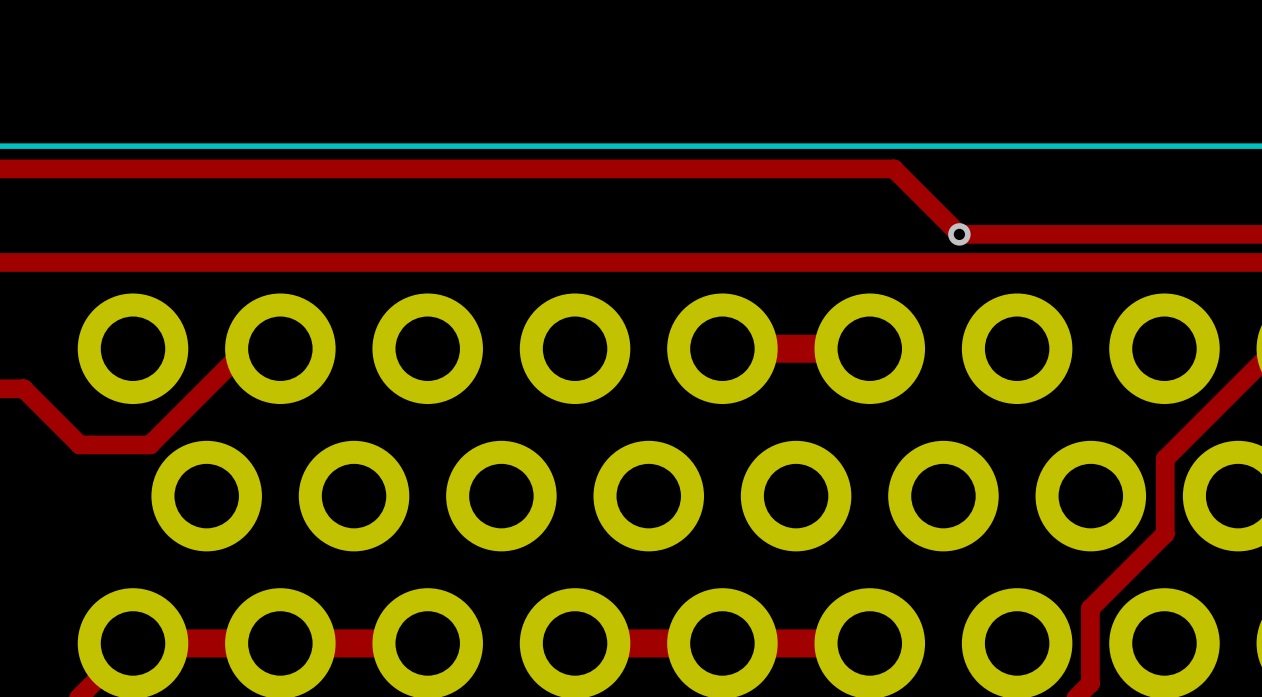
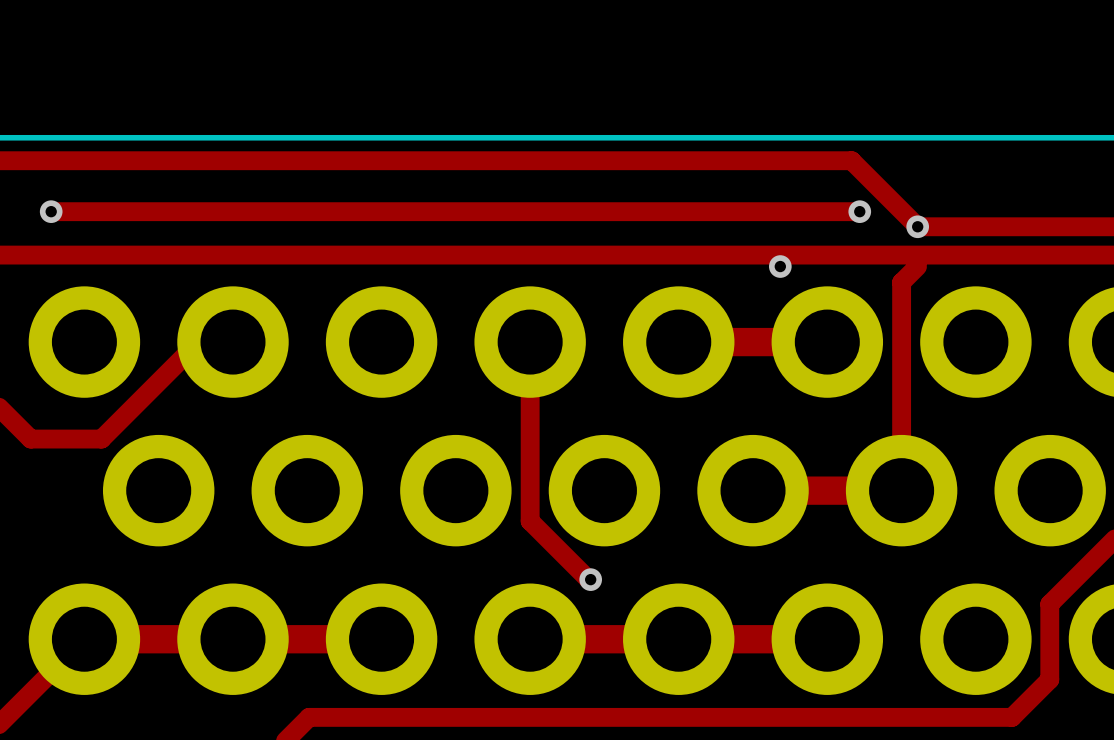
track: none -> (51, 211) (859, 211)
via: none -> (51, 211)
via: none -> (859, 211)
via: none -> (780, 266)
track: none -> (917, 266) (901, 282) (901, 490) (753, 490)
track: none -> (530, 342) (530, 521) (590, 579)
via: none -> (590, 579)

